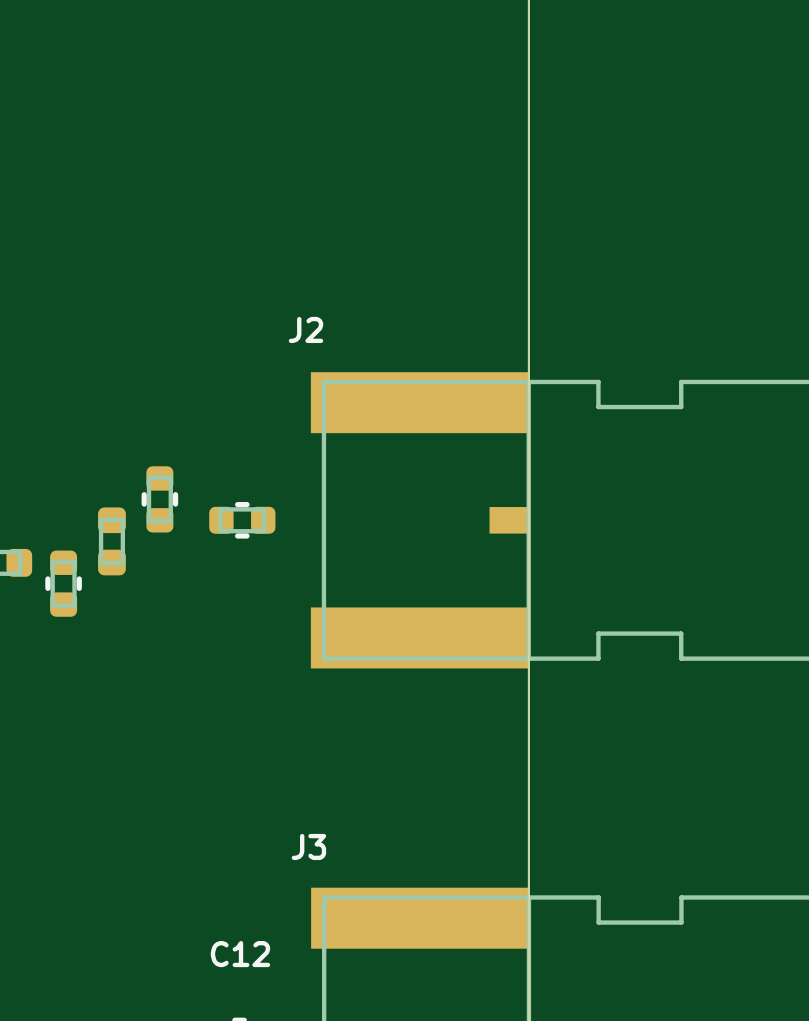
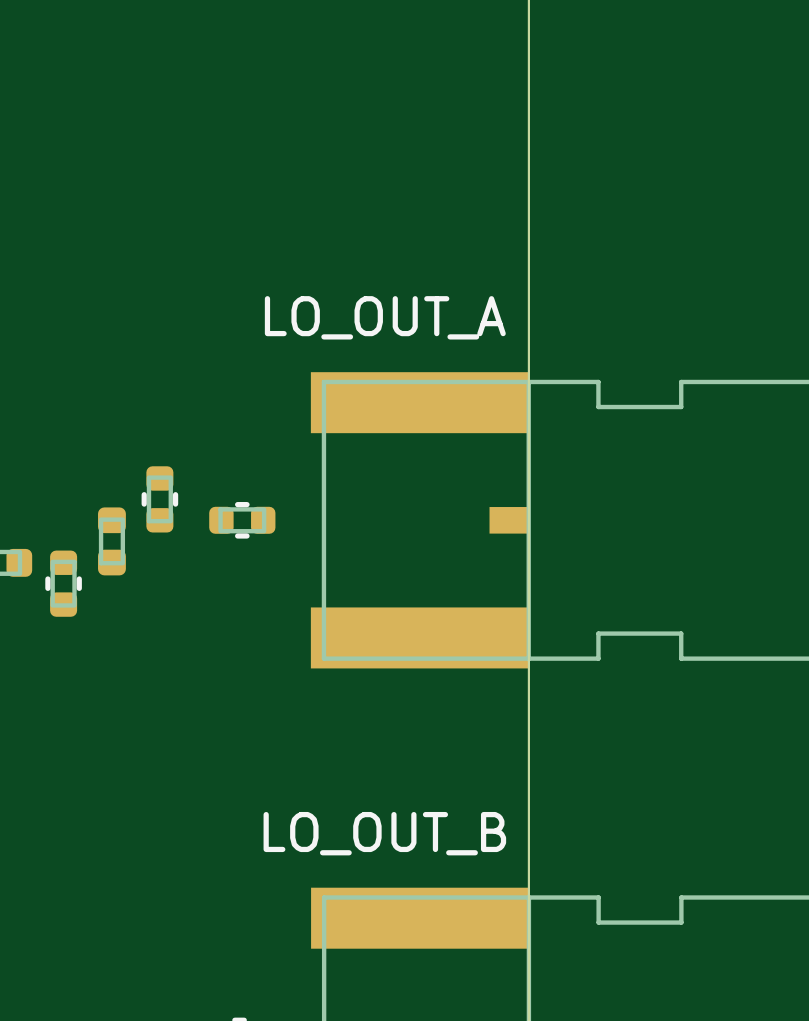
J2 name: J2 (306, 329) -> LO_OUT_A (385, 317)
J3 name: J3 (308, 846) -> LO_OUT_B (384, 833)
C12 name: C12 (240, 954) -> none

